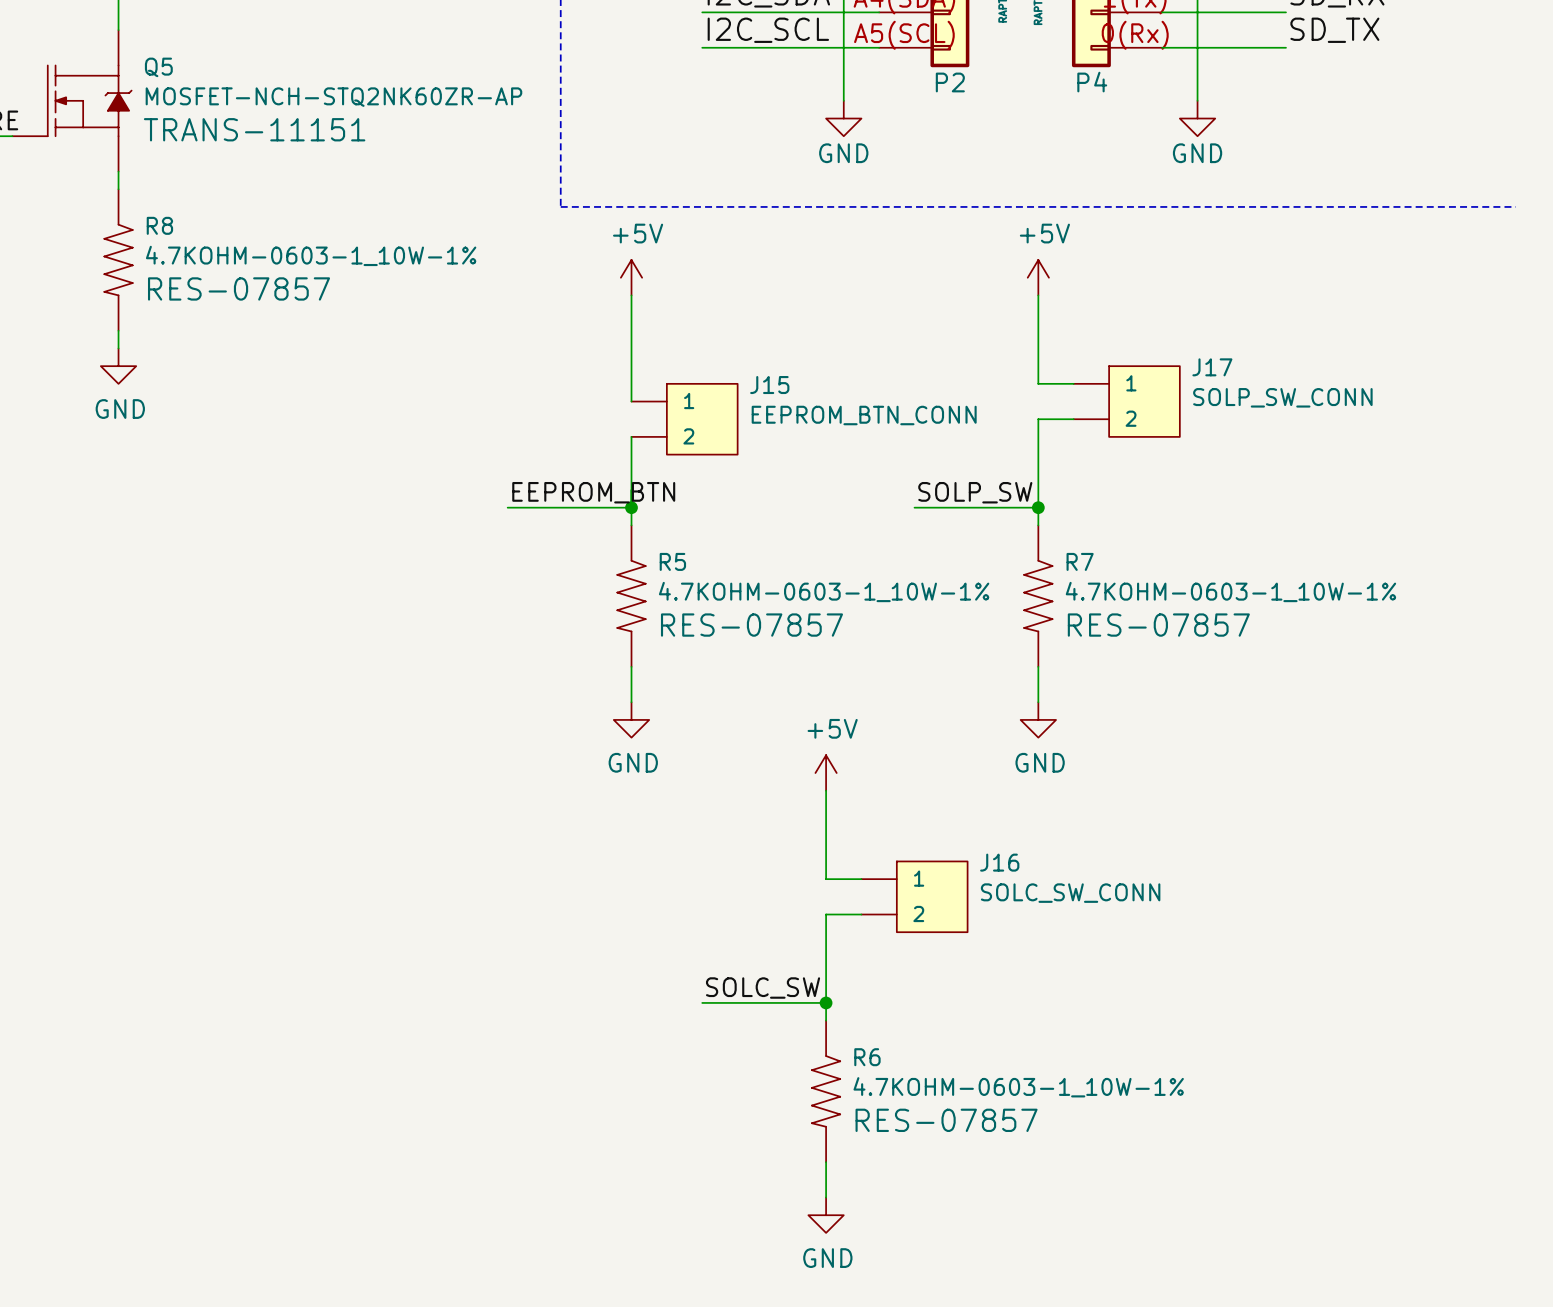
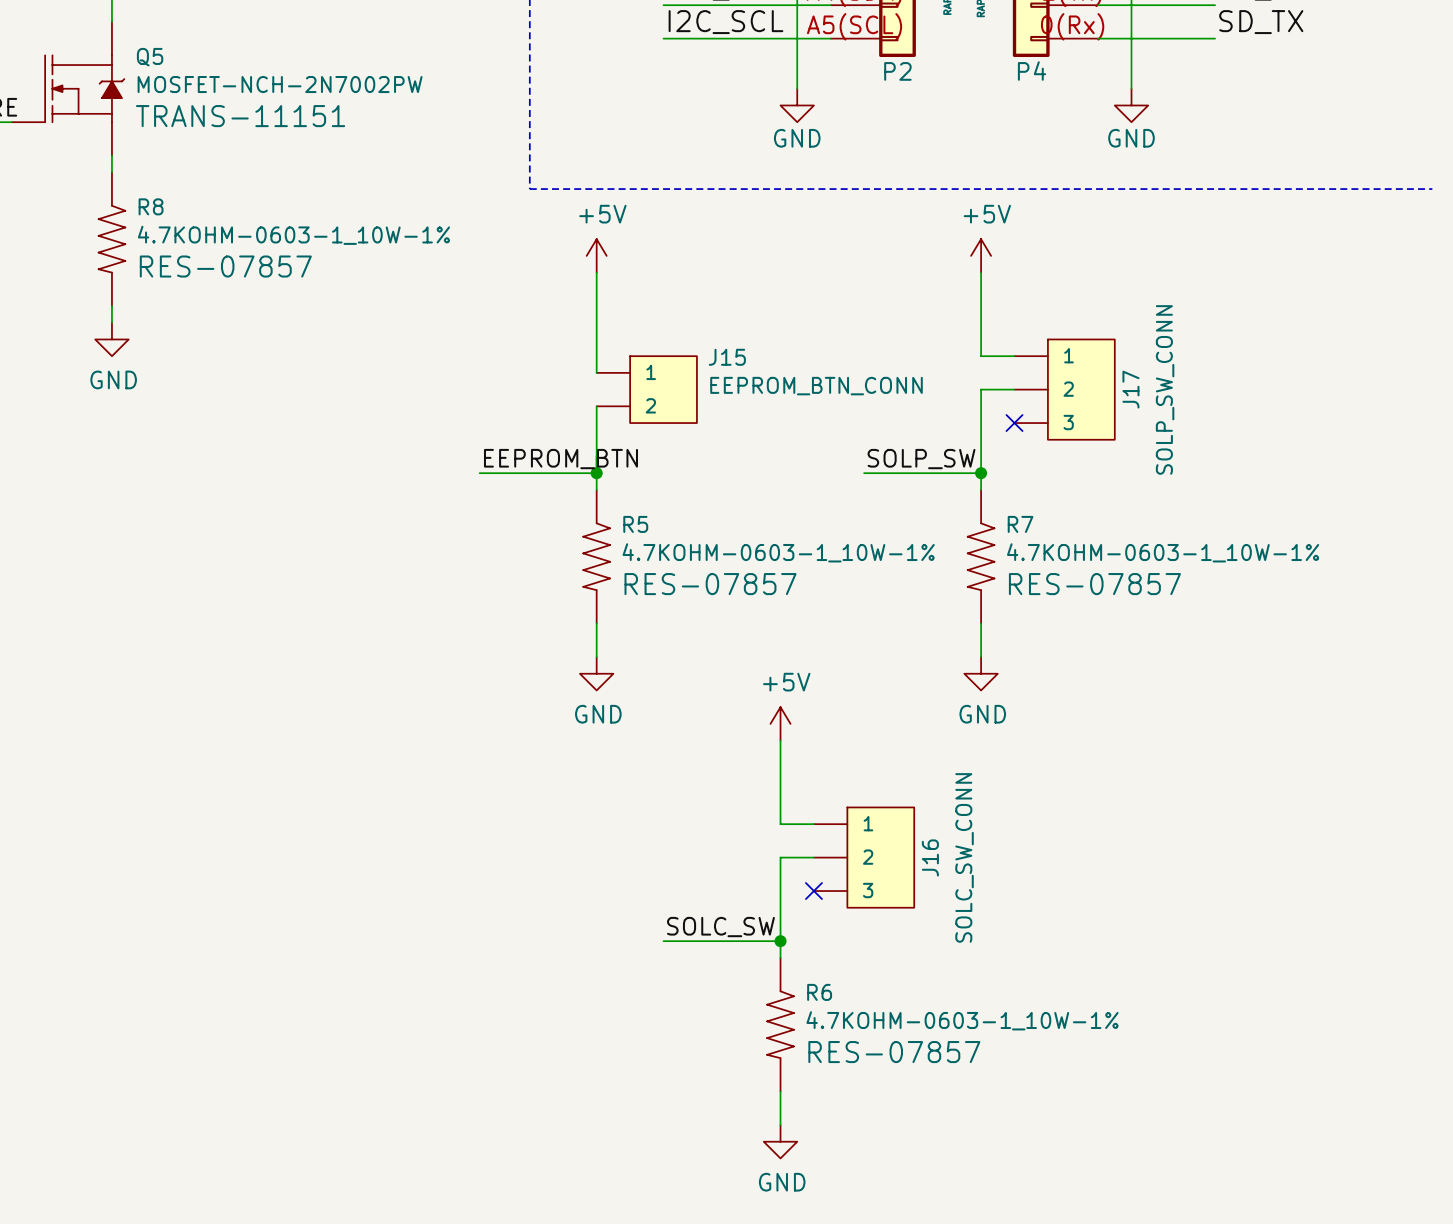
Q5 value: MOSFET-NCH-STQ2NK60ZR-AP (333, 97) -> MOSFET-NCH-2N7002PW (280, 84)
J17 symbol: [1073, 366, 1180, 437] -> [1014, 339, 1115, 440]
J17 name position: J17 (1212, 367) -> J17 (1130, 389)
J17 value position: SOLP_SW_CONN (1282, 397) -> SOLP_SW_CONN (1165, 389)
no-connect mark: none -> (1014, 423)
J16 symbol: [861, 861, 968, 933] -> [813, 807, 915, 908]
J16 name position: J16 (999, 862) -> J16 (930, 857)
J16 value position: SOLC_SW_CONN (1070, 893) -> SOLC_SW_CONN (964, 857)
no-connect mark: none -> (813, 891)

